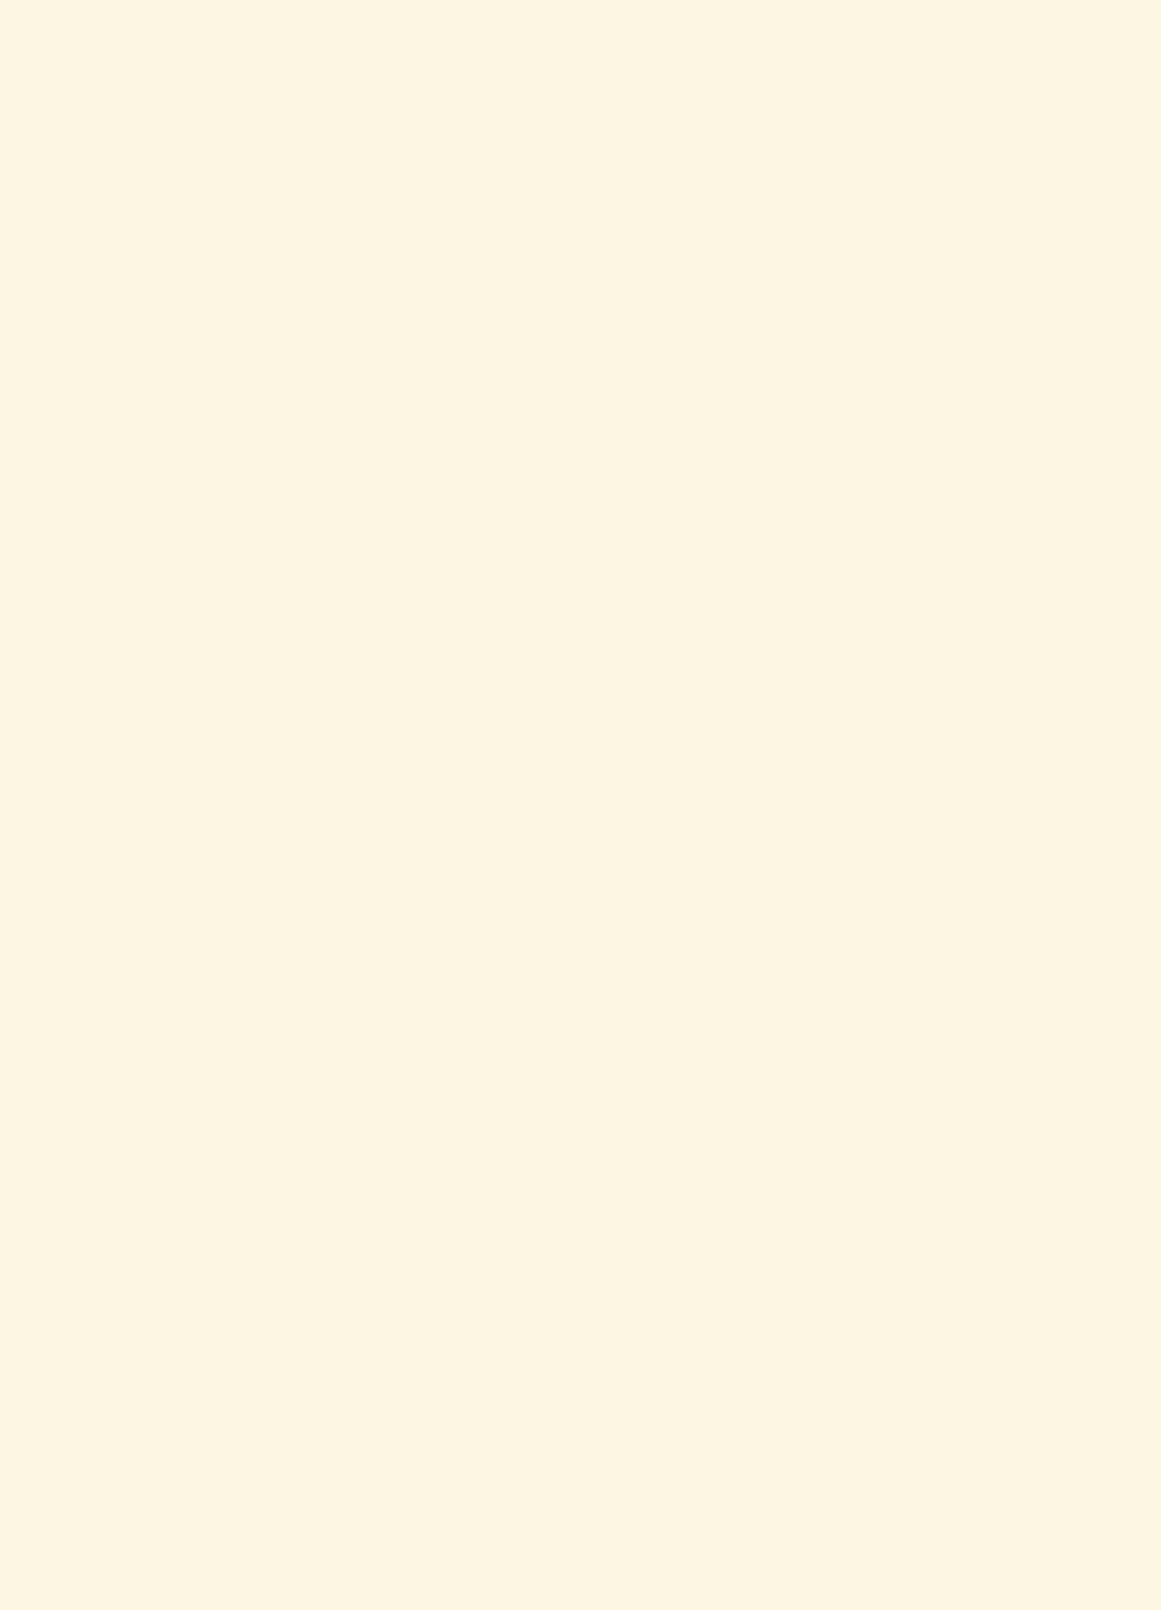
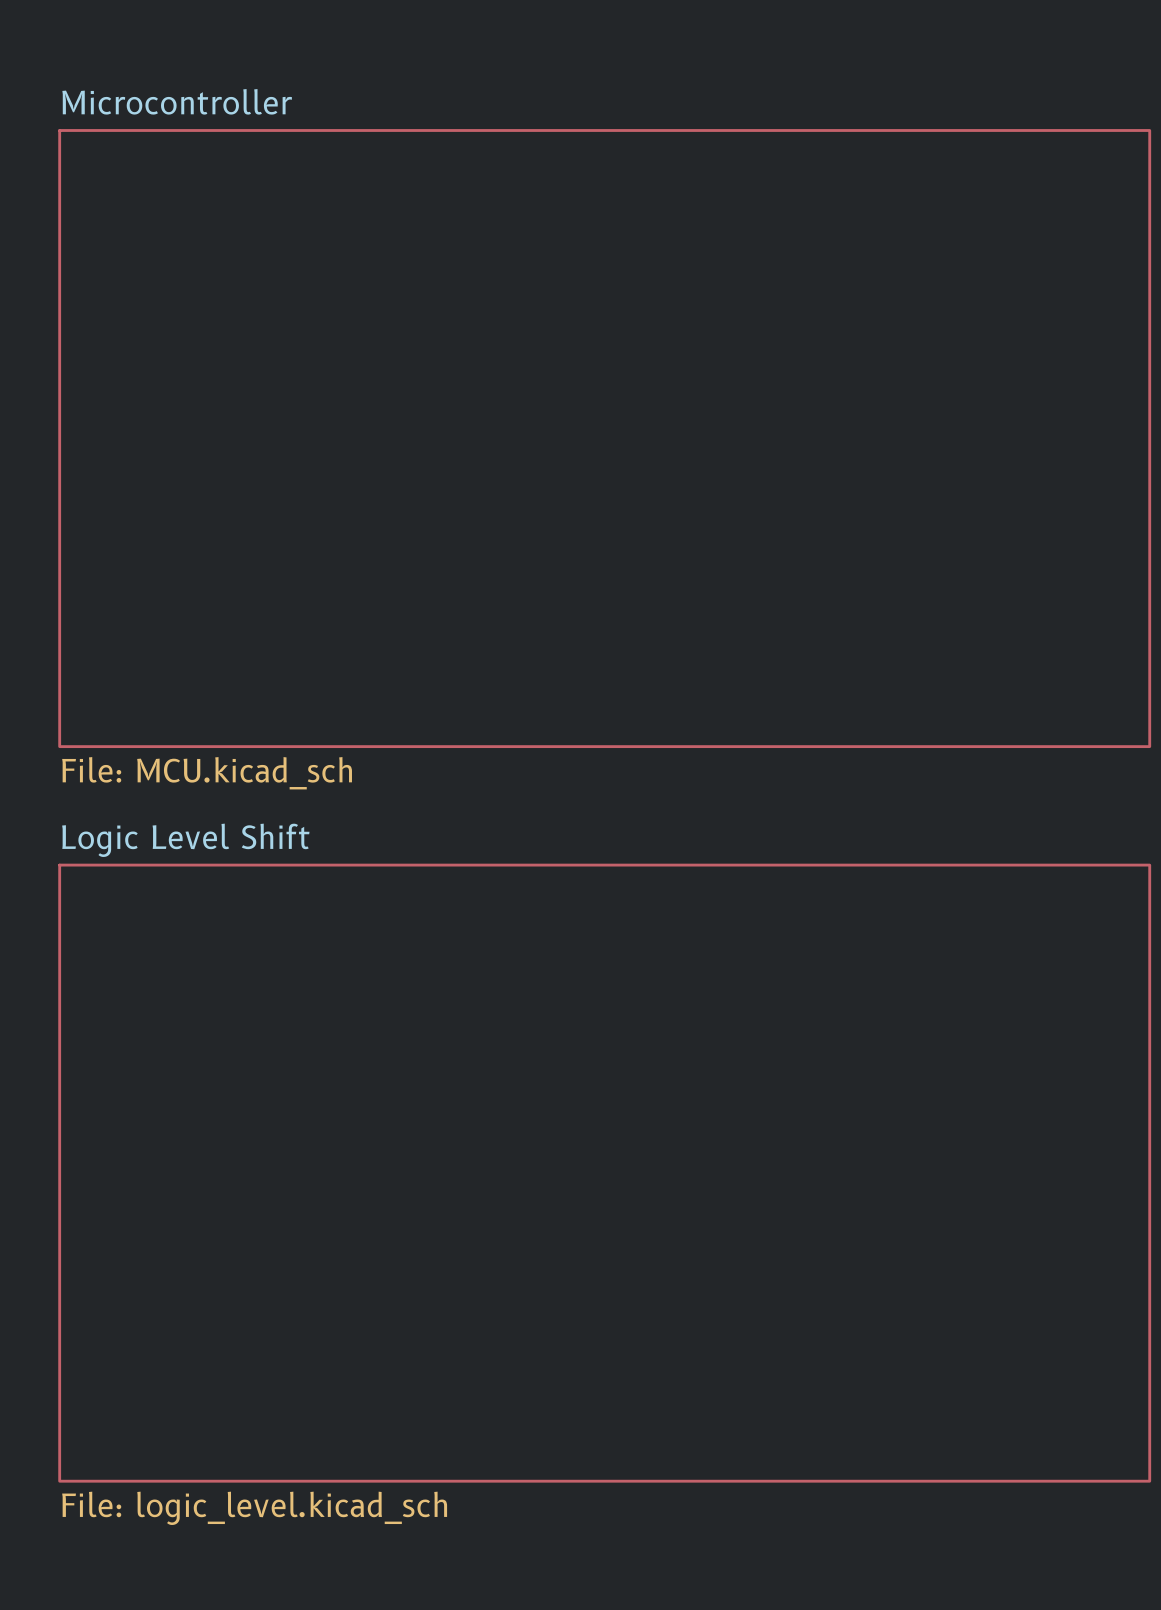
sheet Microcontroller: none -> File: MCU.kicad_sch (604, 438)
sheet Logic Level Shift: none -> File: logic_level.kicad_sch (604, 1173)

